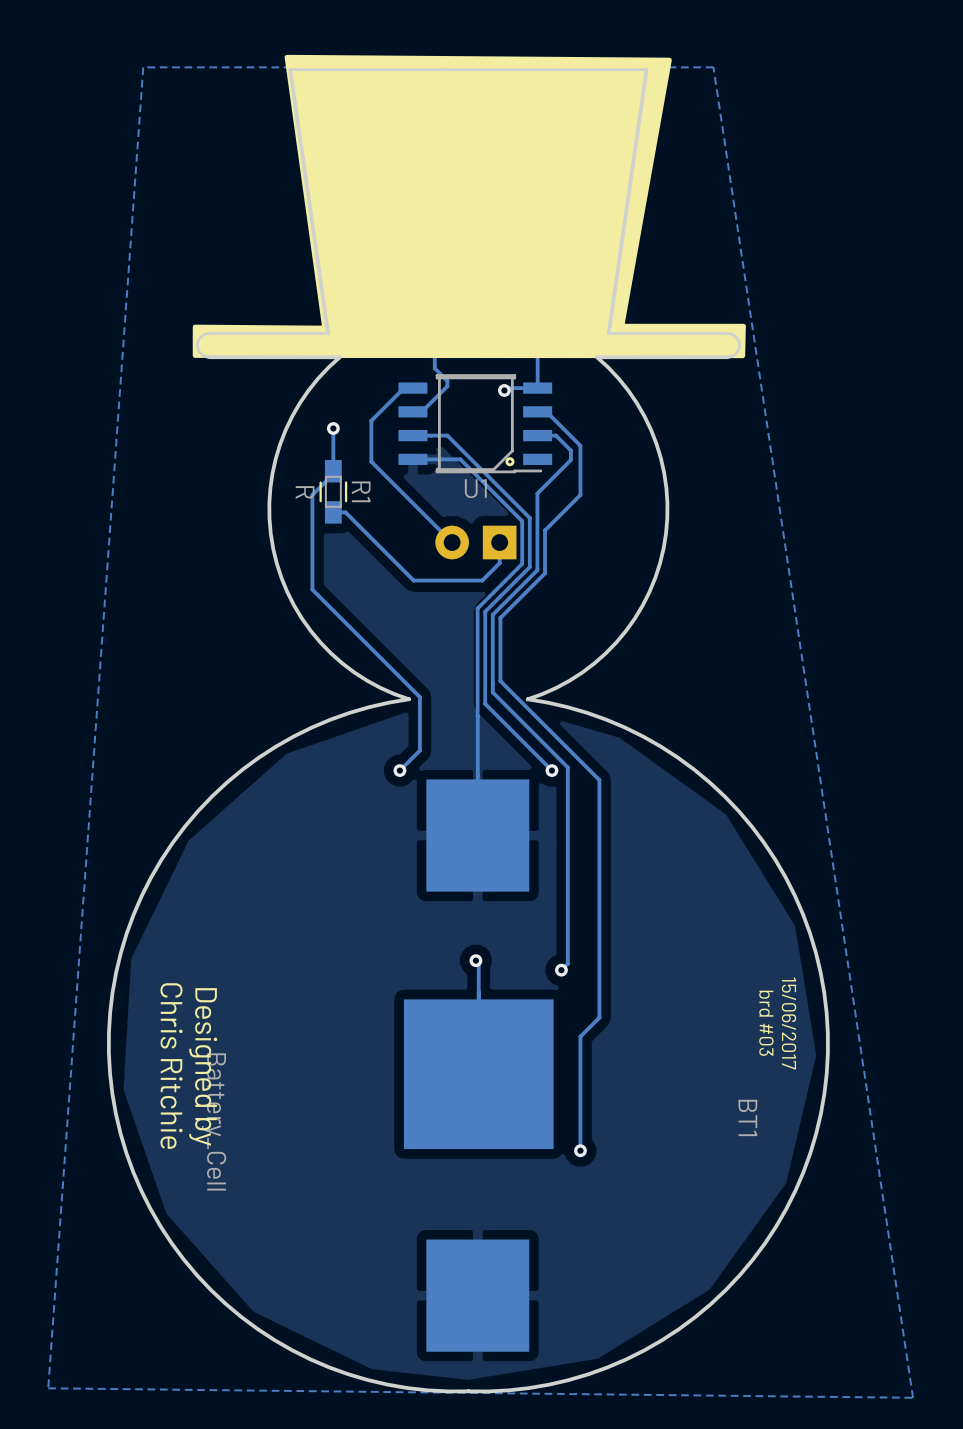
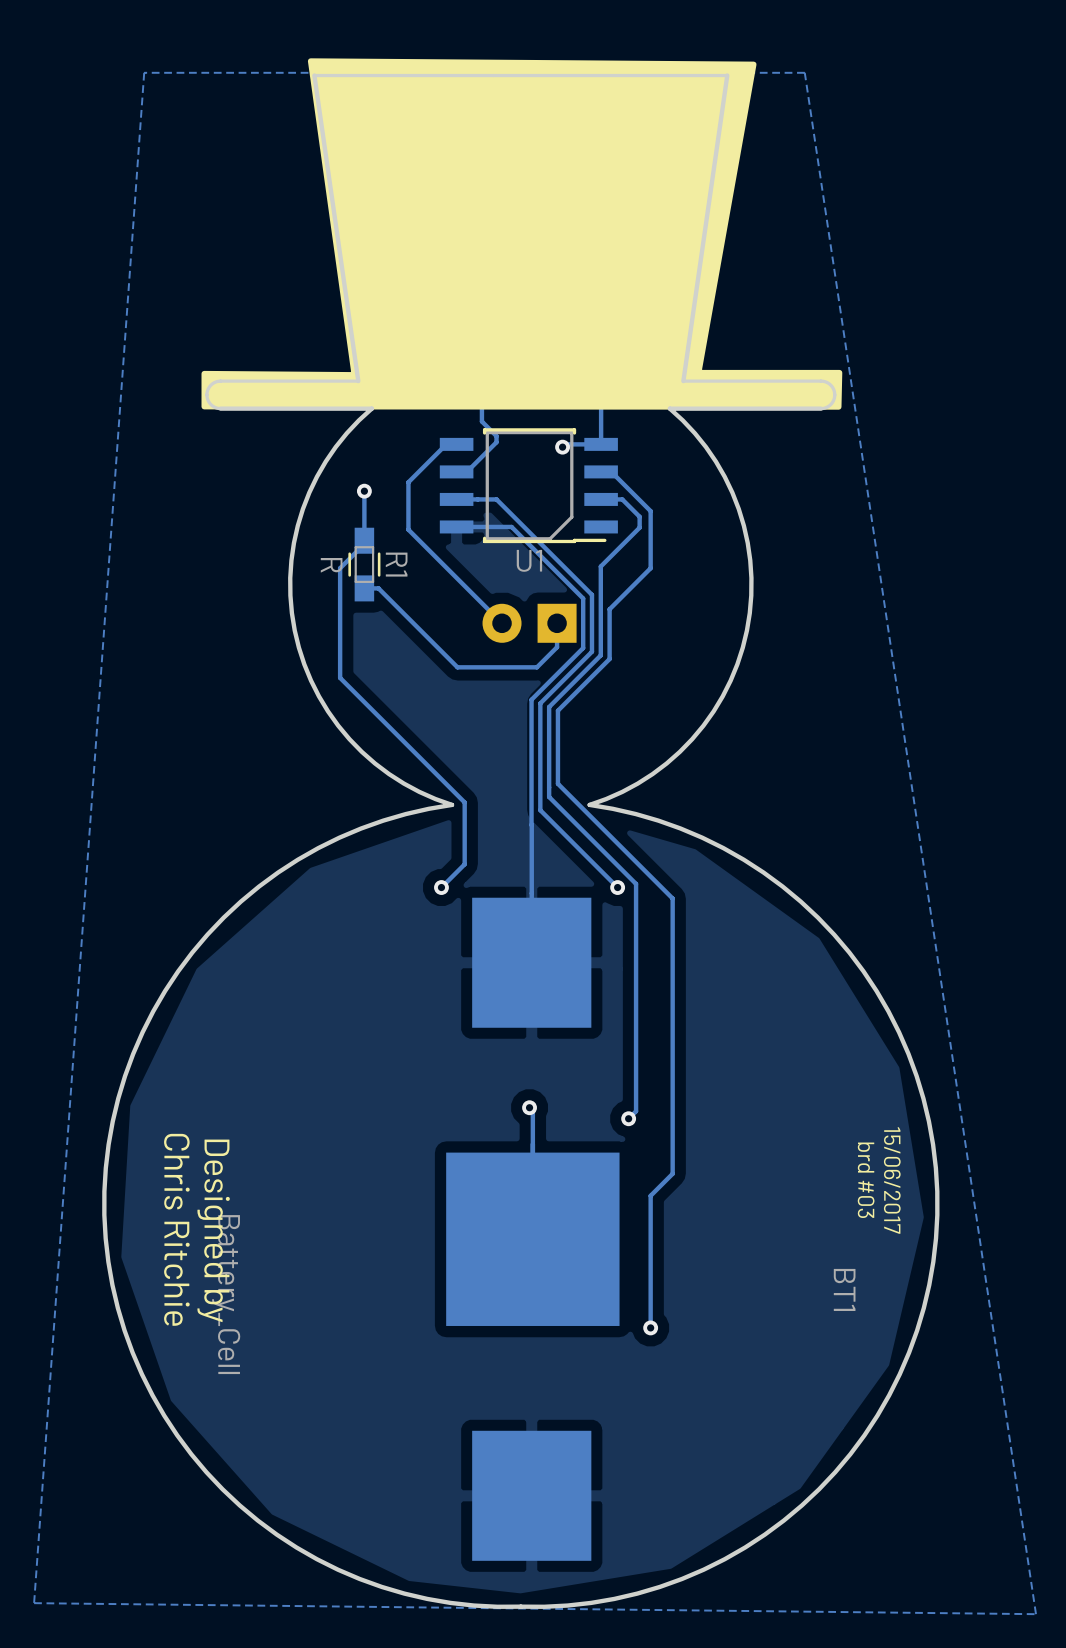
U1 footprint: [398, 374, 553, 474] -> [439, 428, 618, 544]

